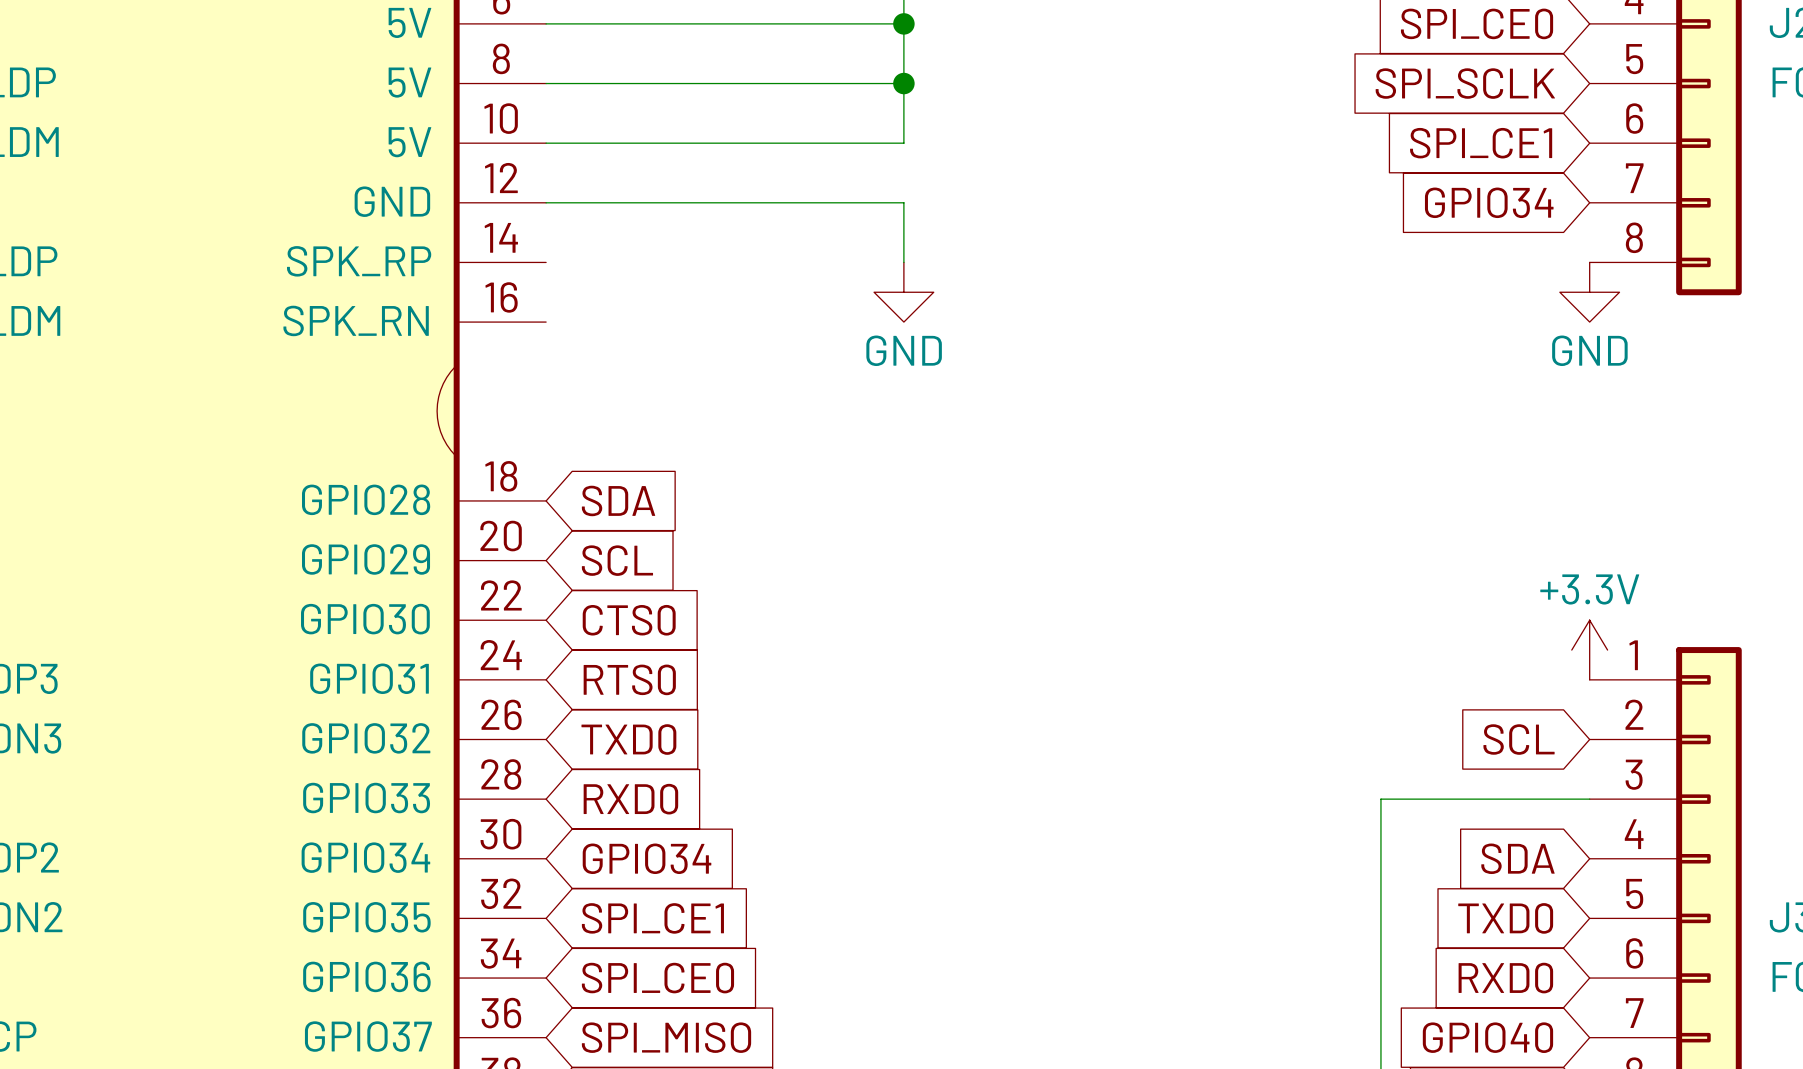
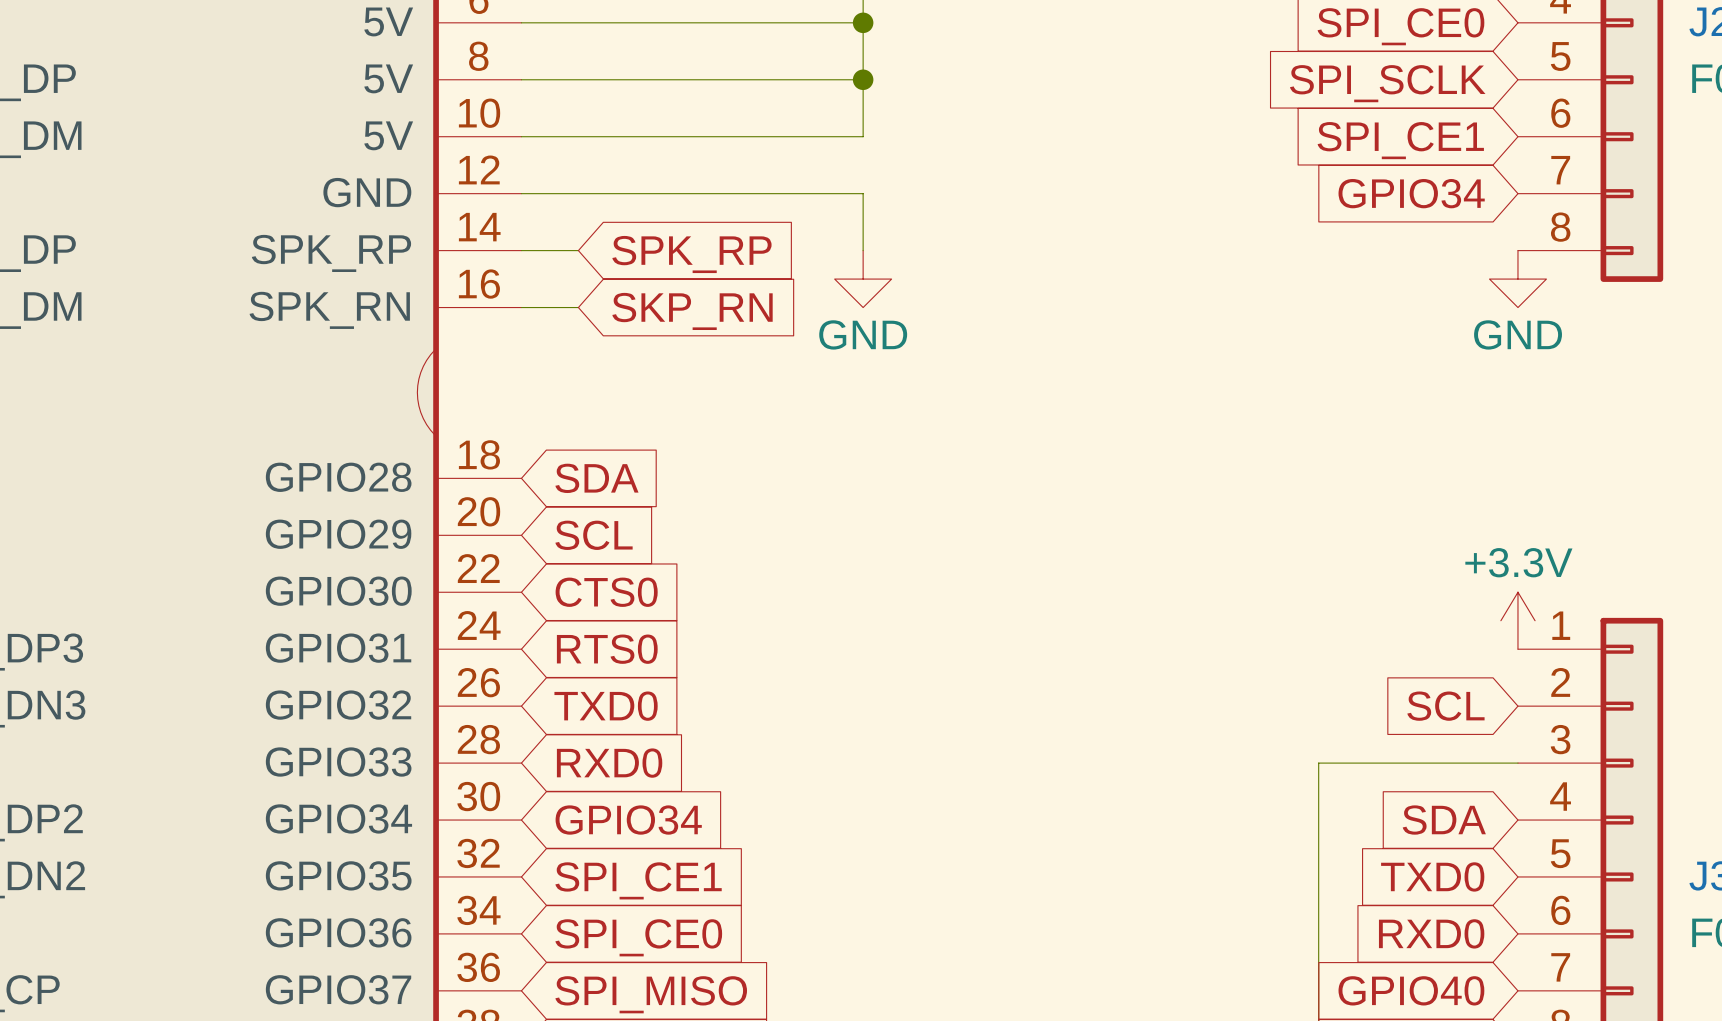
wire: none -> (521, 250) (578, 250)
global label: none -> SPK_RP (691, 254)
wire: none -> (521, 307) (578, 307)
global label: none -> SKP_RN (692, 311)

